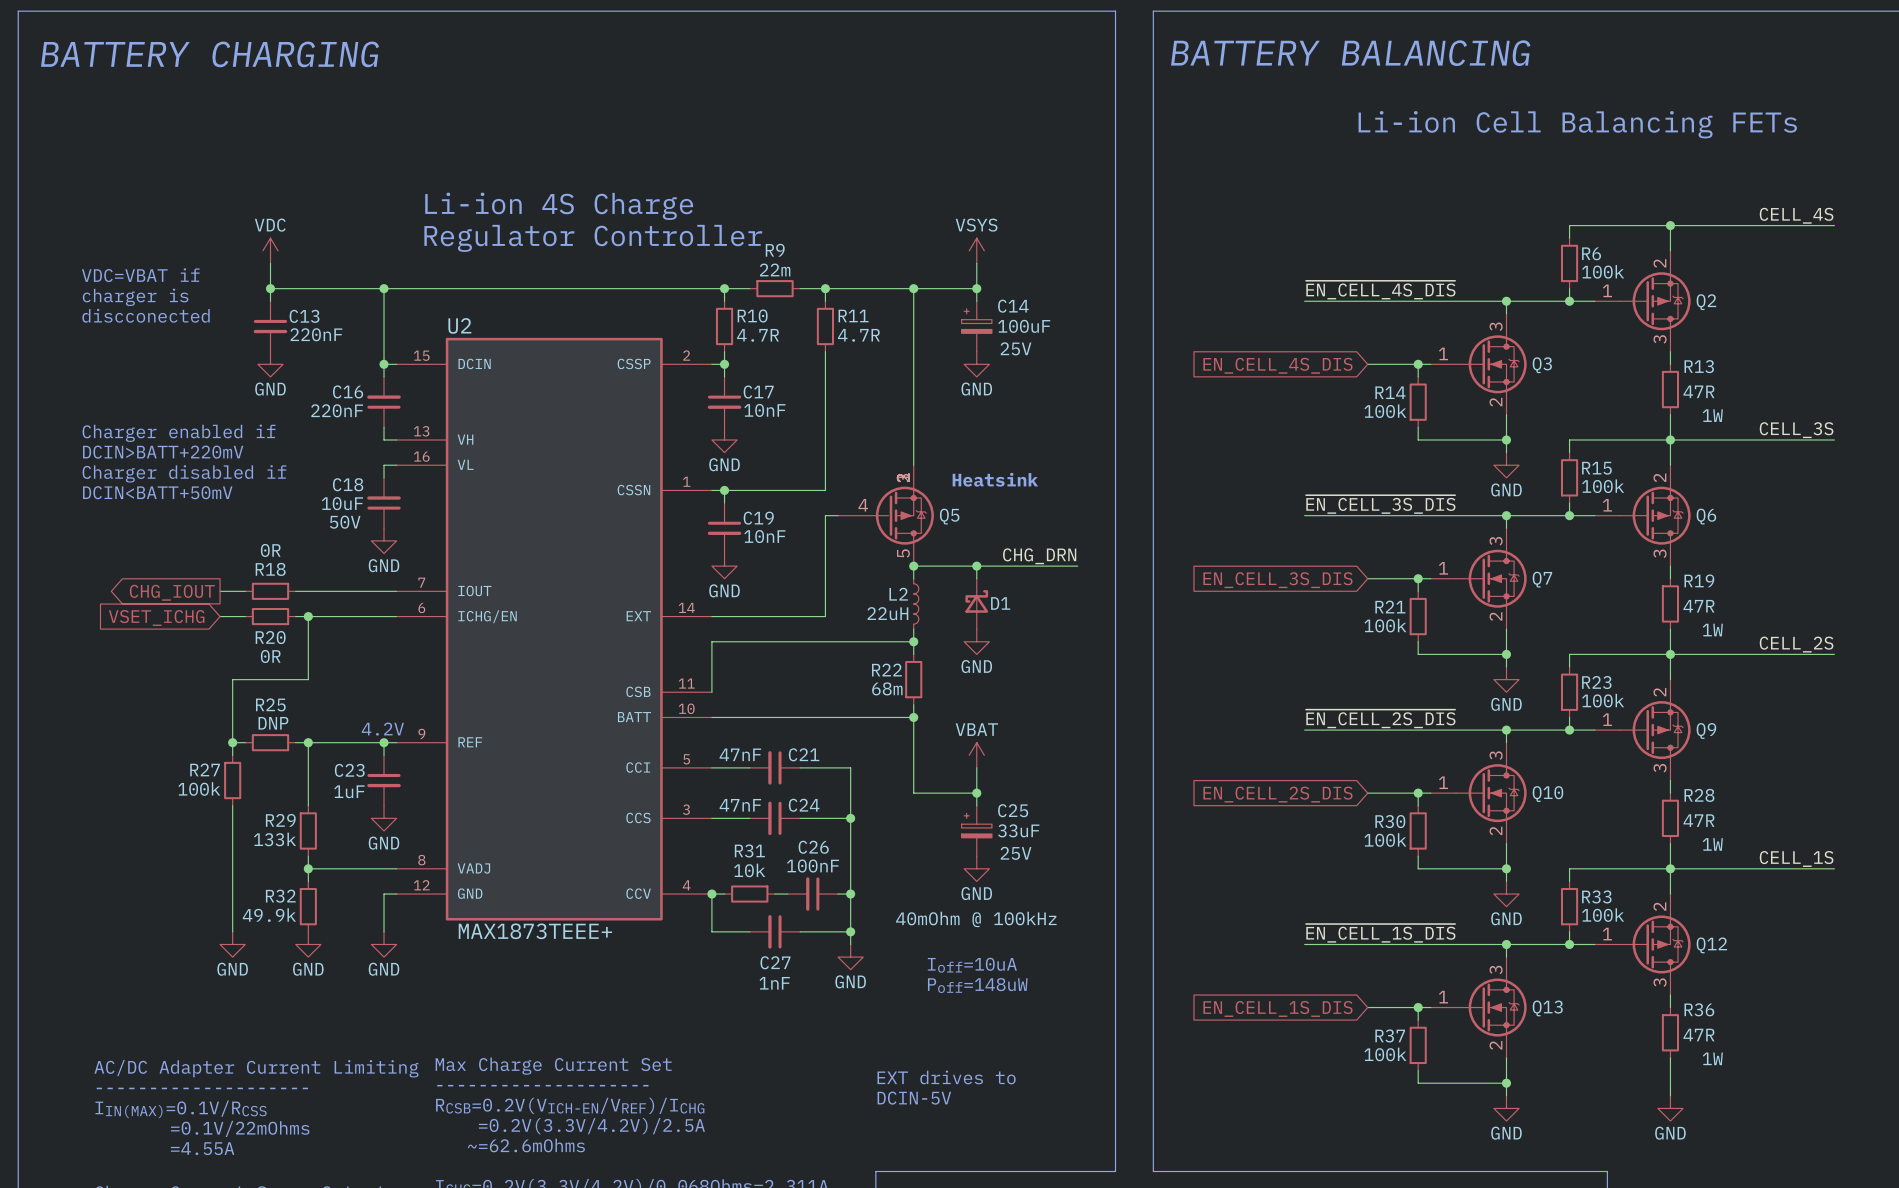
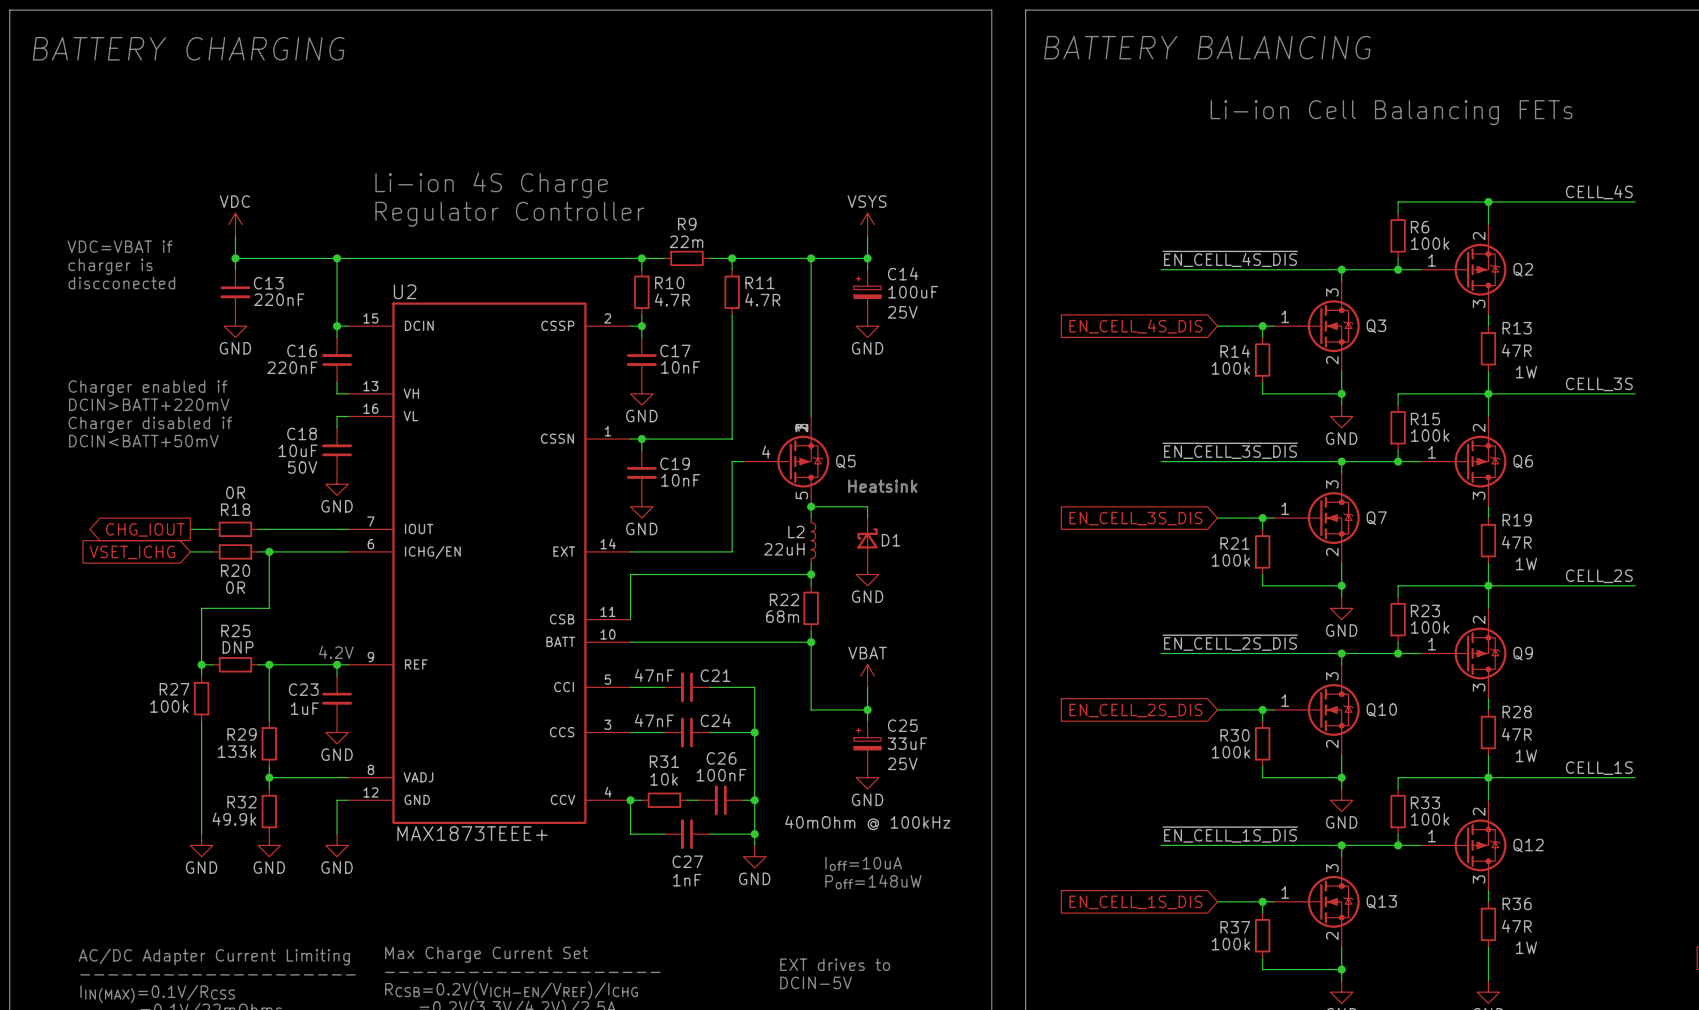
text position: Heatsink (995, 479) -> Heatsink (882, 486)
label: CHG_DRN (1039, 556) -> none
wire: (976, 566) (1077, 566) -> none
junction: (976, 566) -> none

